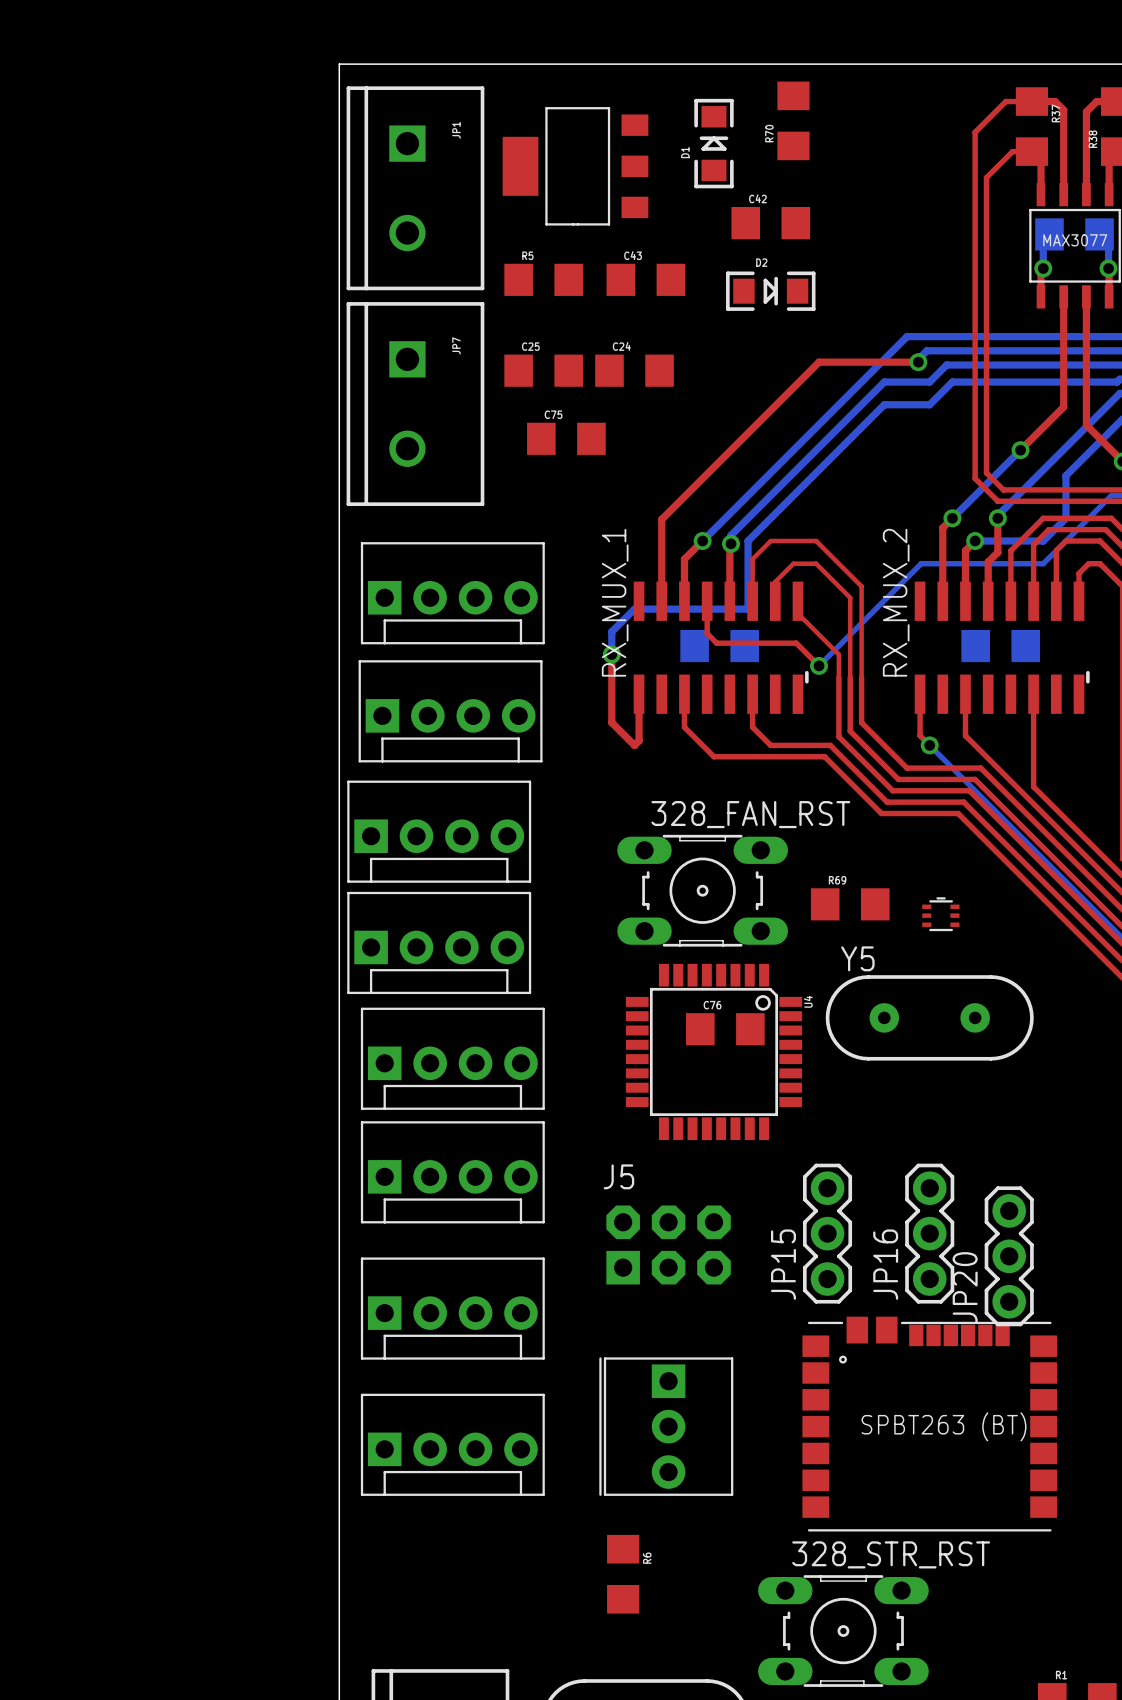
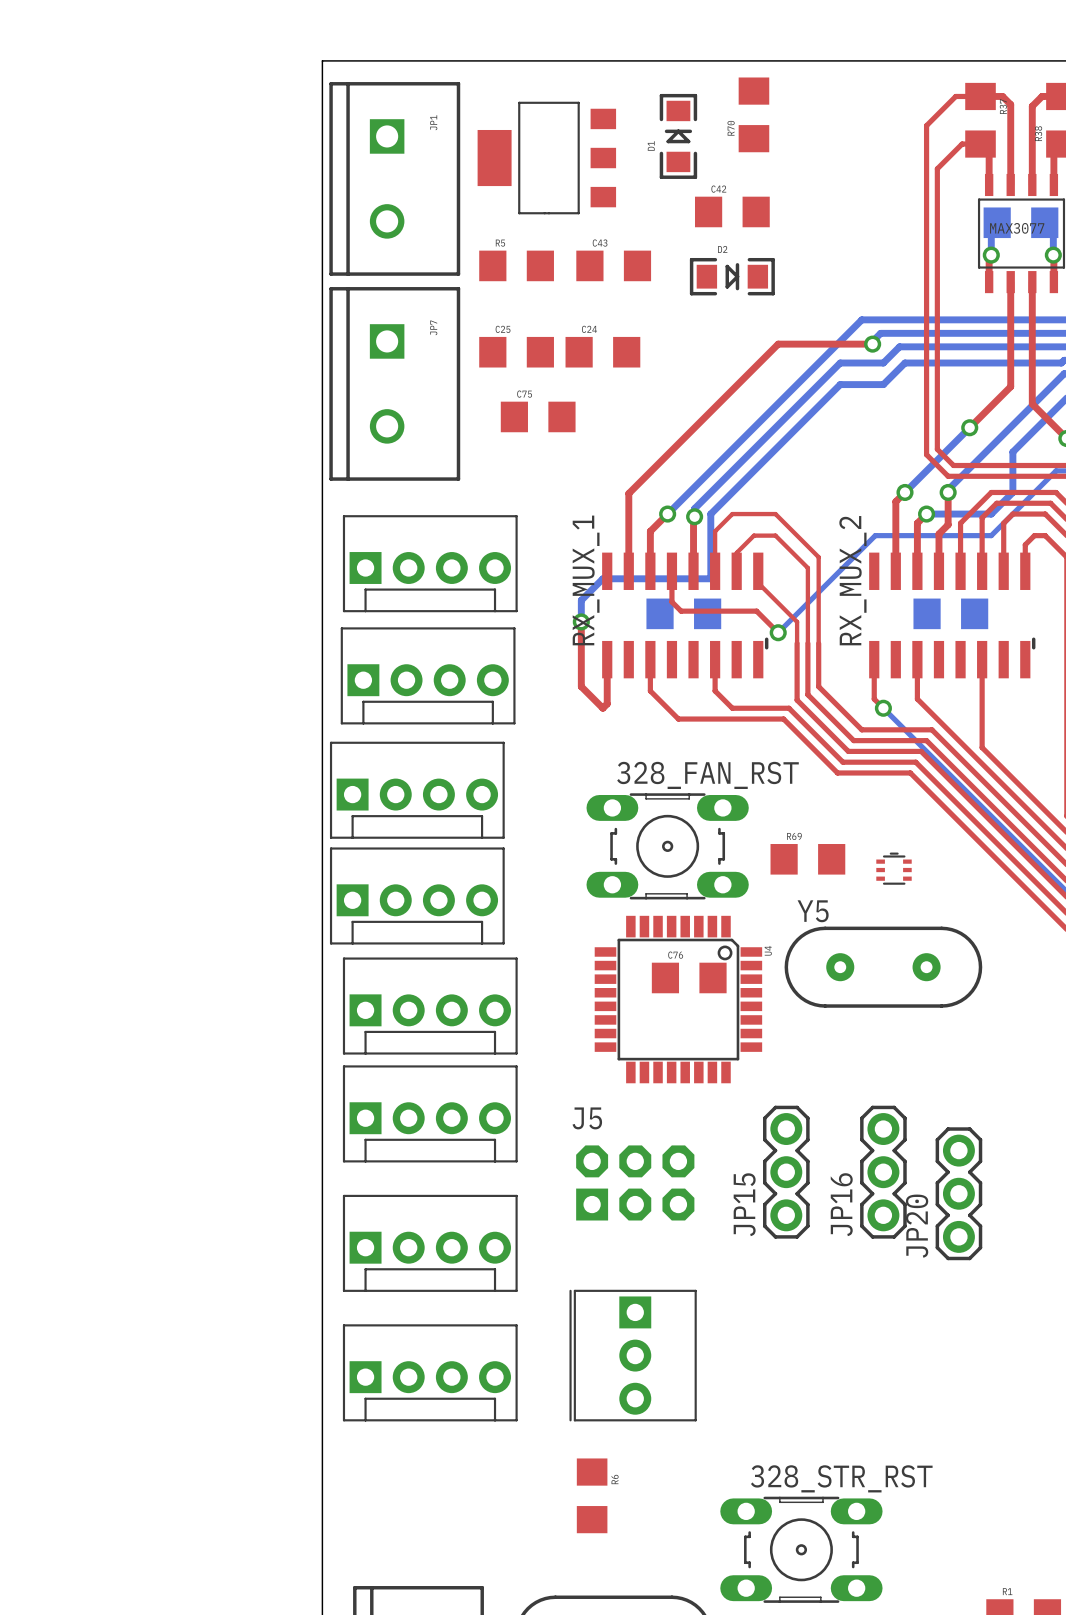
part: (929, 1424) -> none

